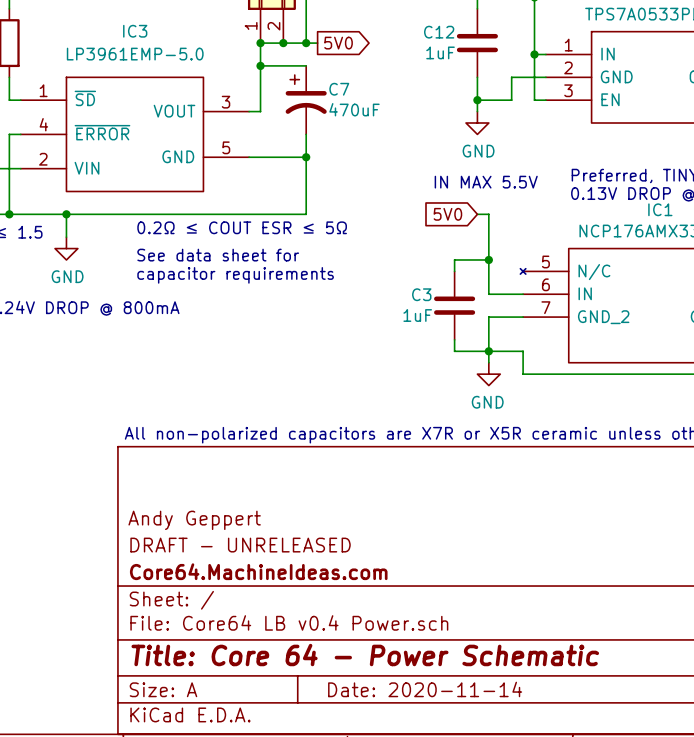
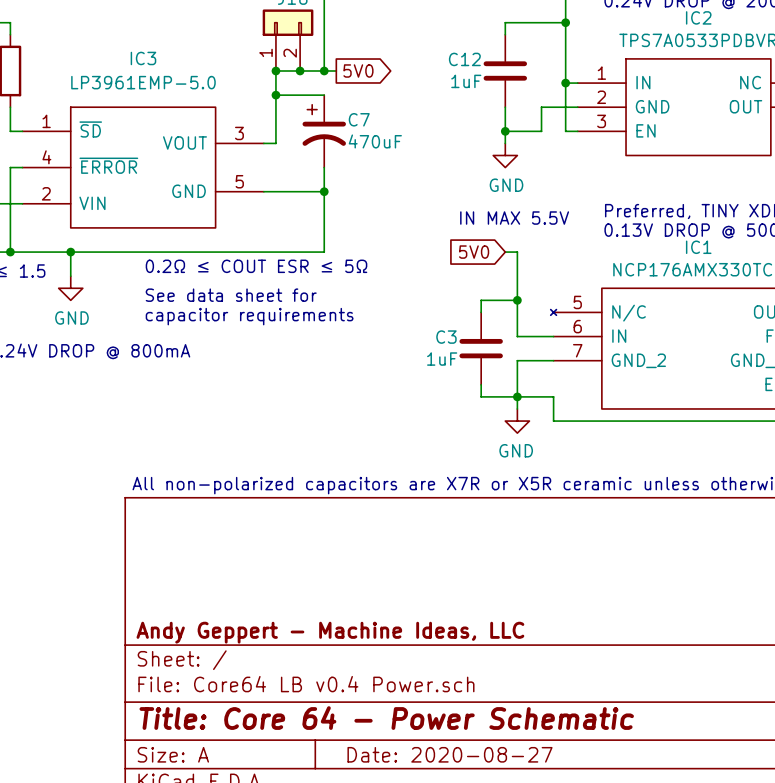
title block: Andy Geppert (194, 520) -> none
title block: DRAFT - UNRELEASED (240, 545) -> none
title block: Core64.MachineIdeas.com (258, 571) -> Andy Geppert - Machine Ideas, LLC (330, 632)
title block: Date: 2020-11-14 (425, 689) -> Date: 2020-08-27 (450, 754)

